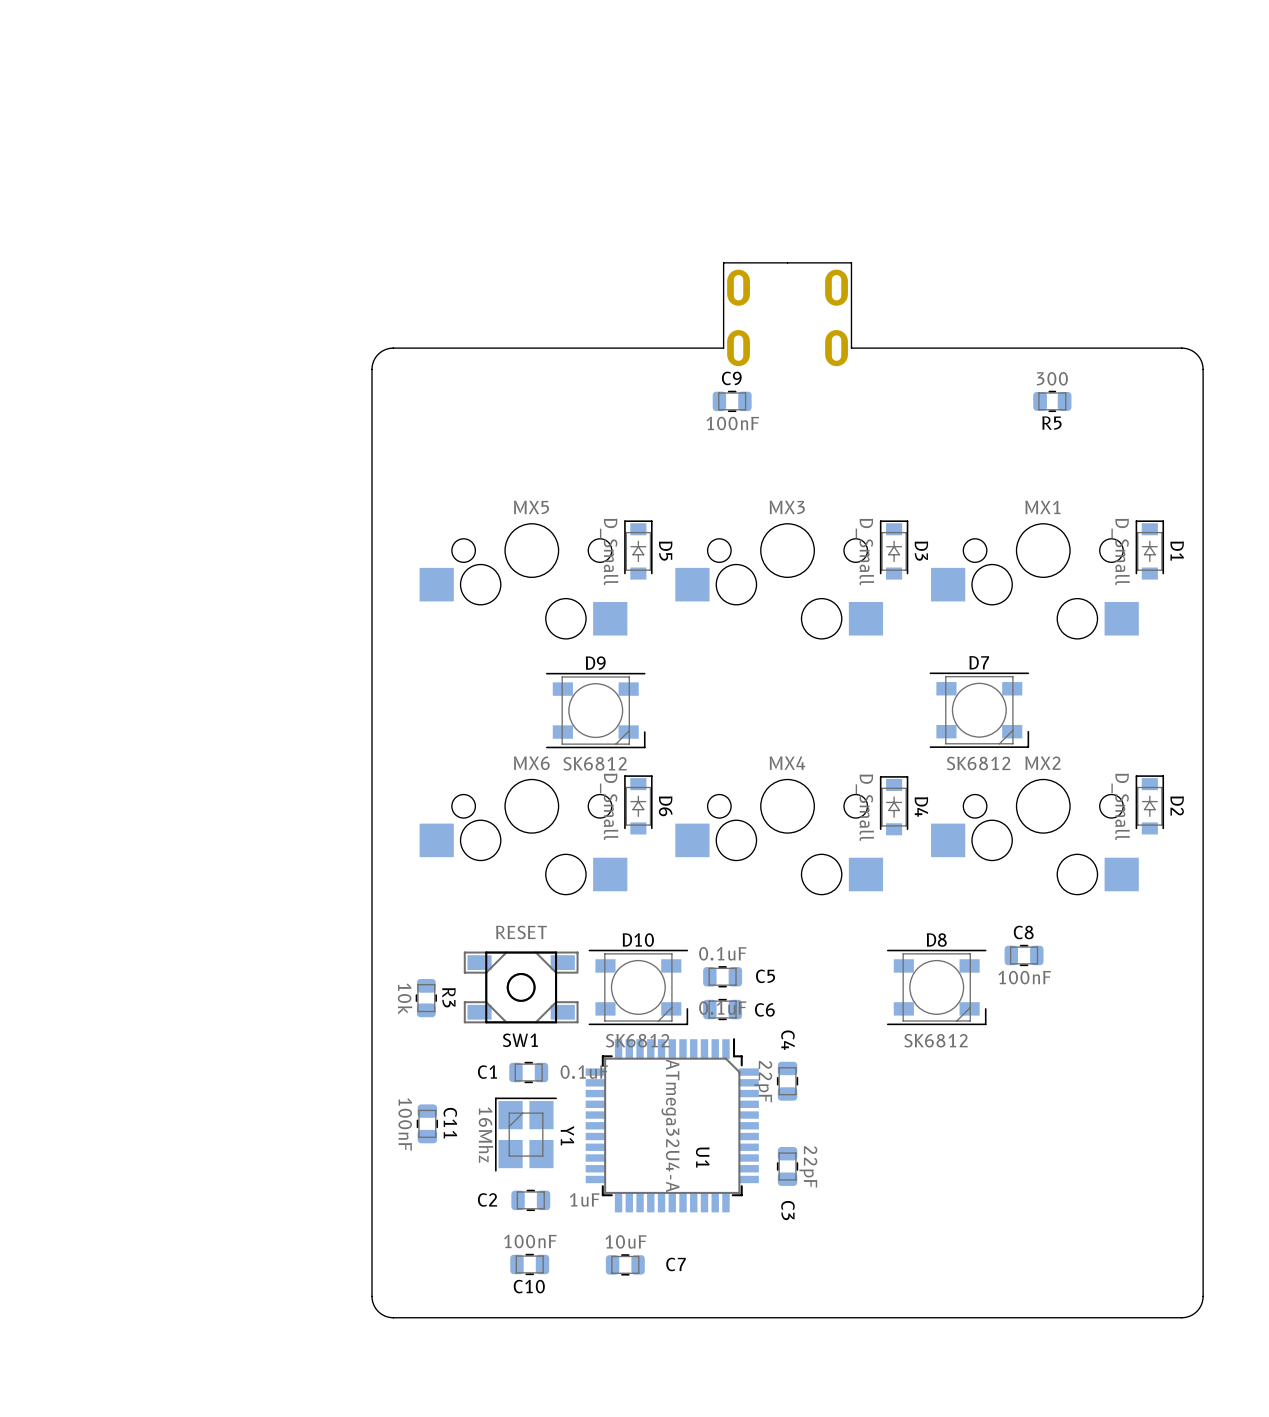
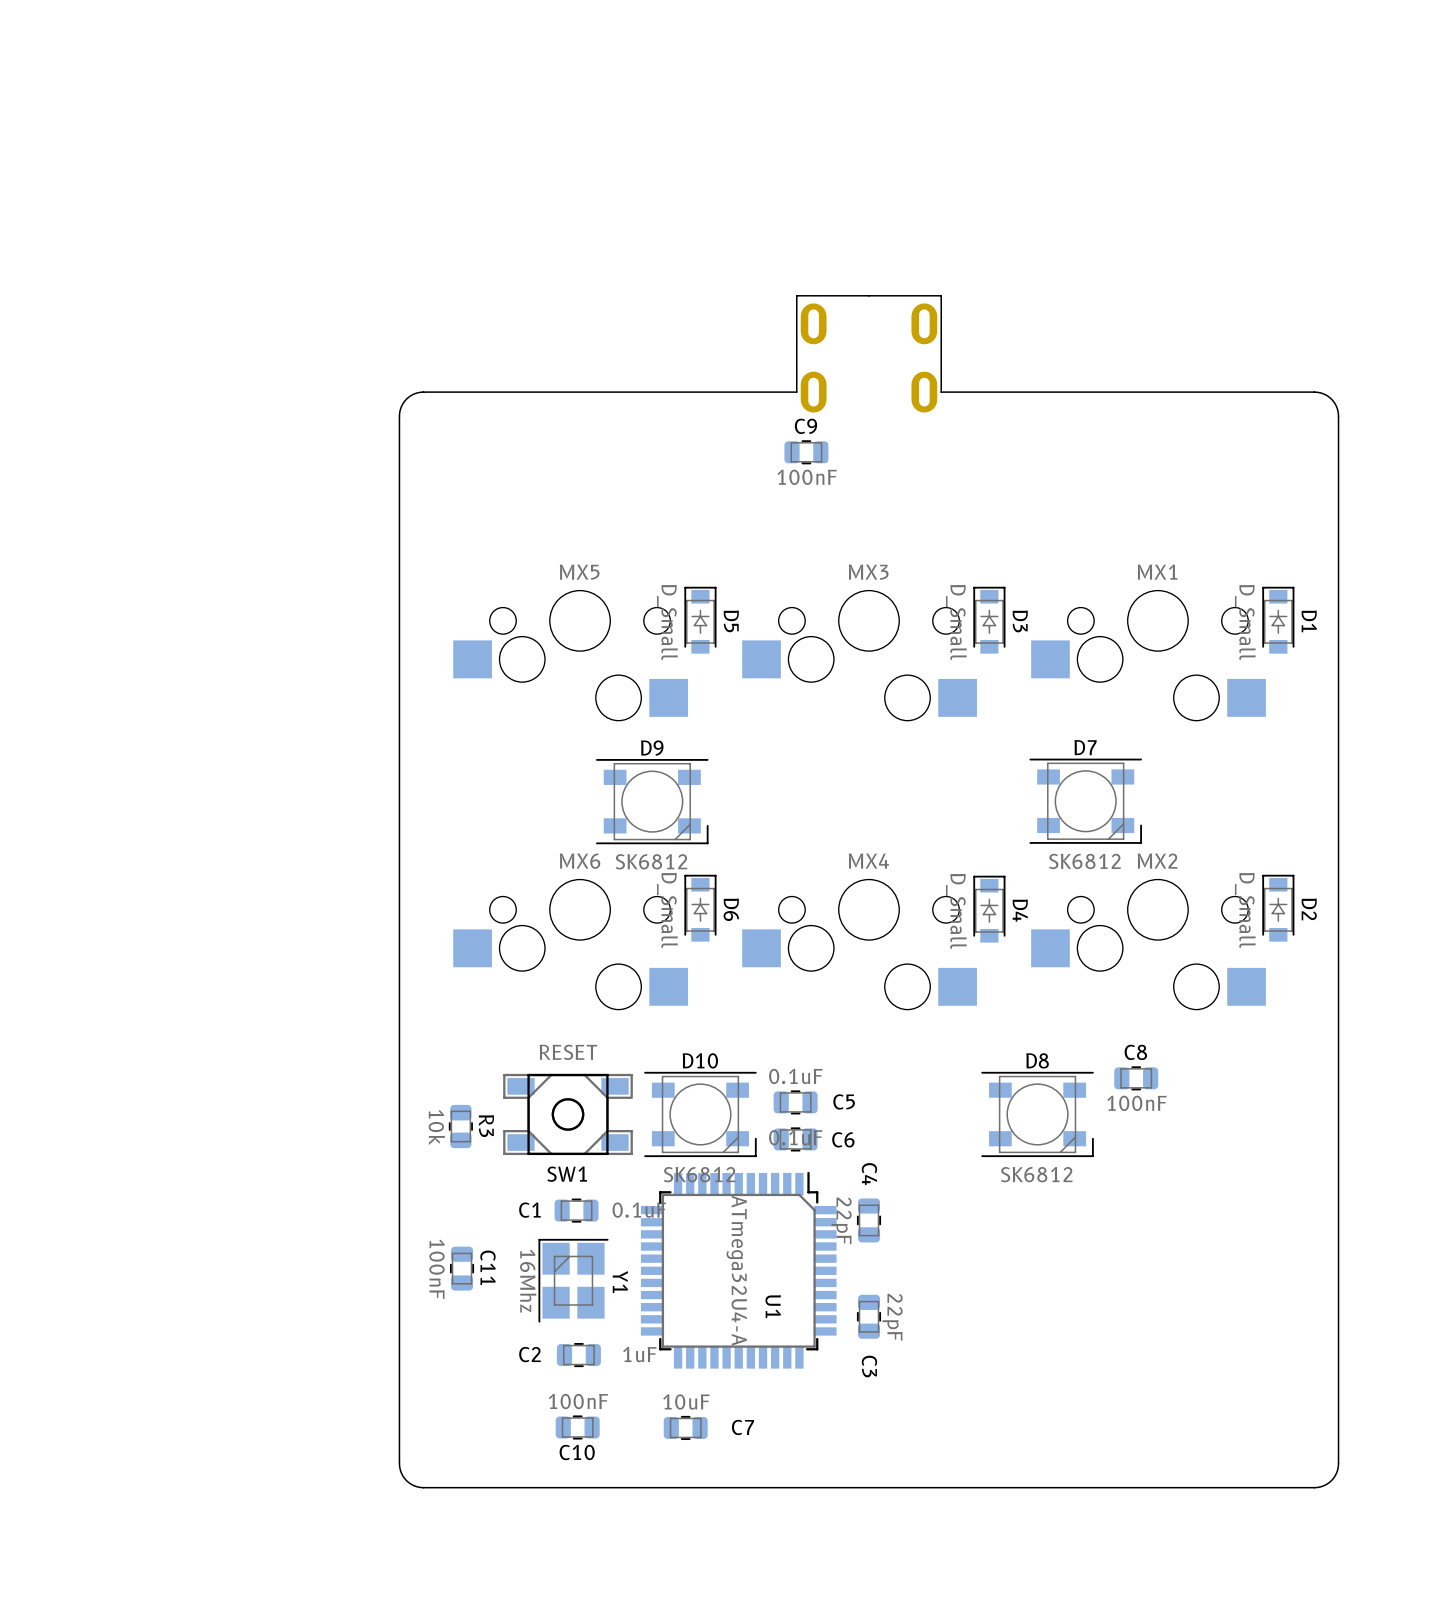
R5: 300 (1052, 401) -> none

